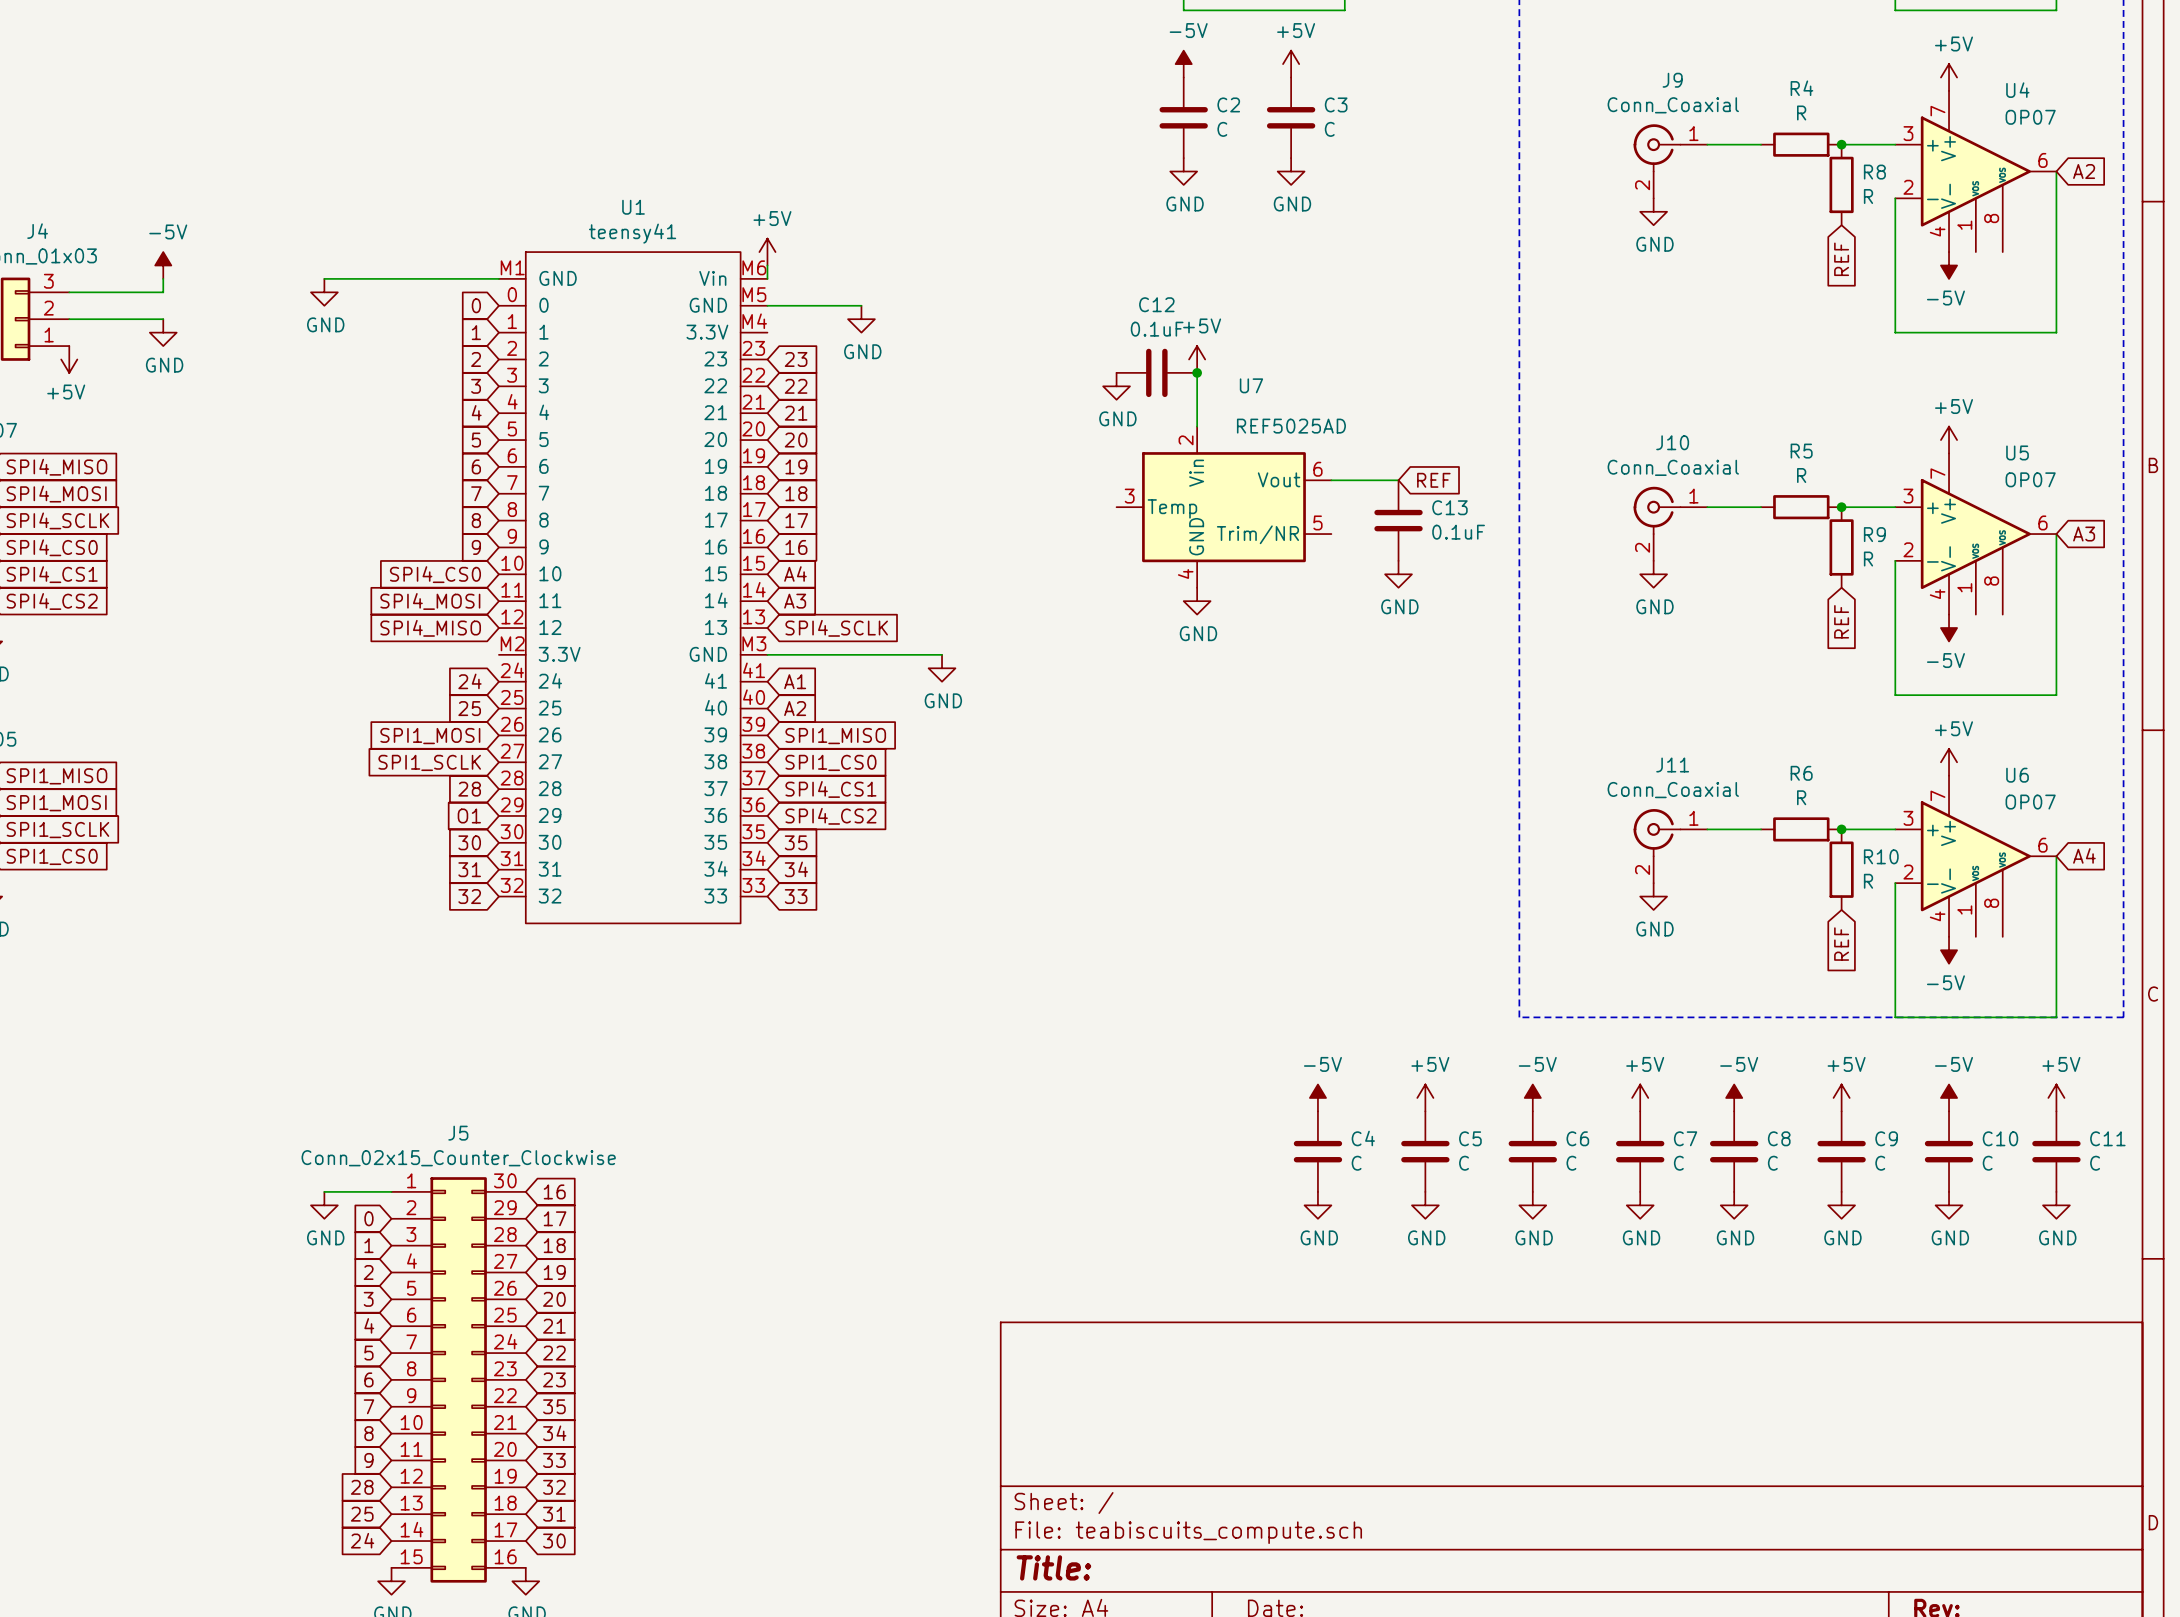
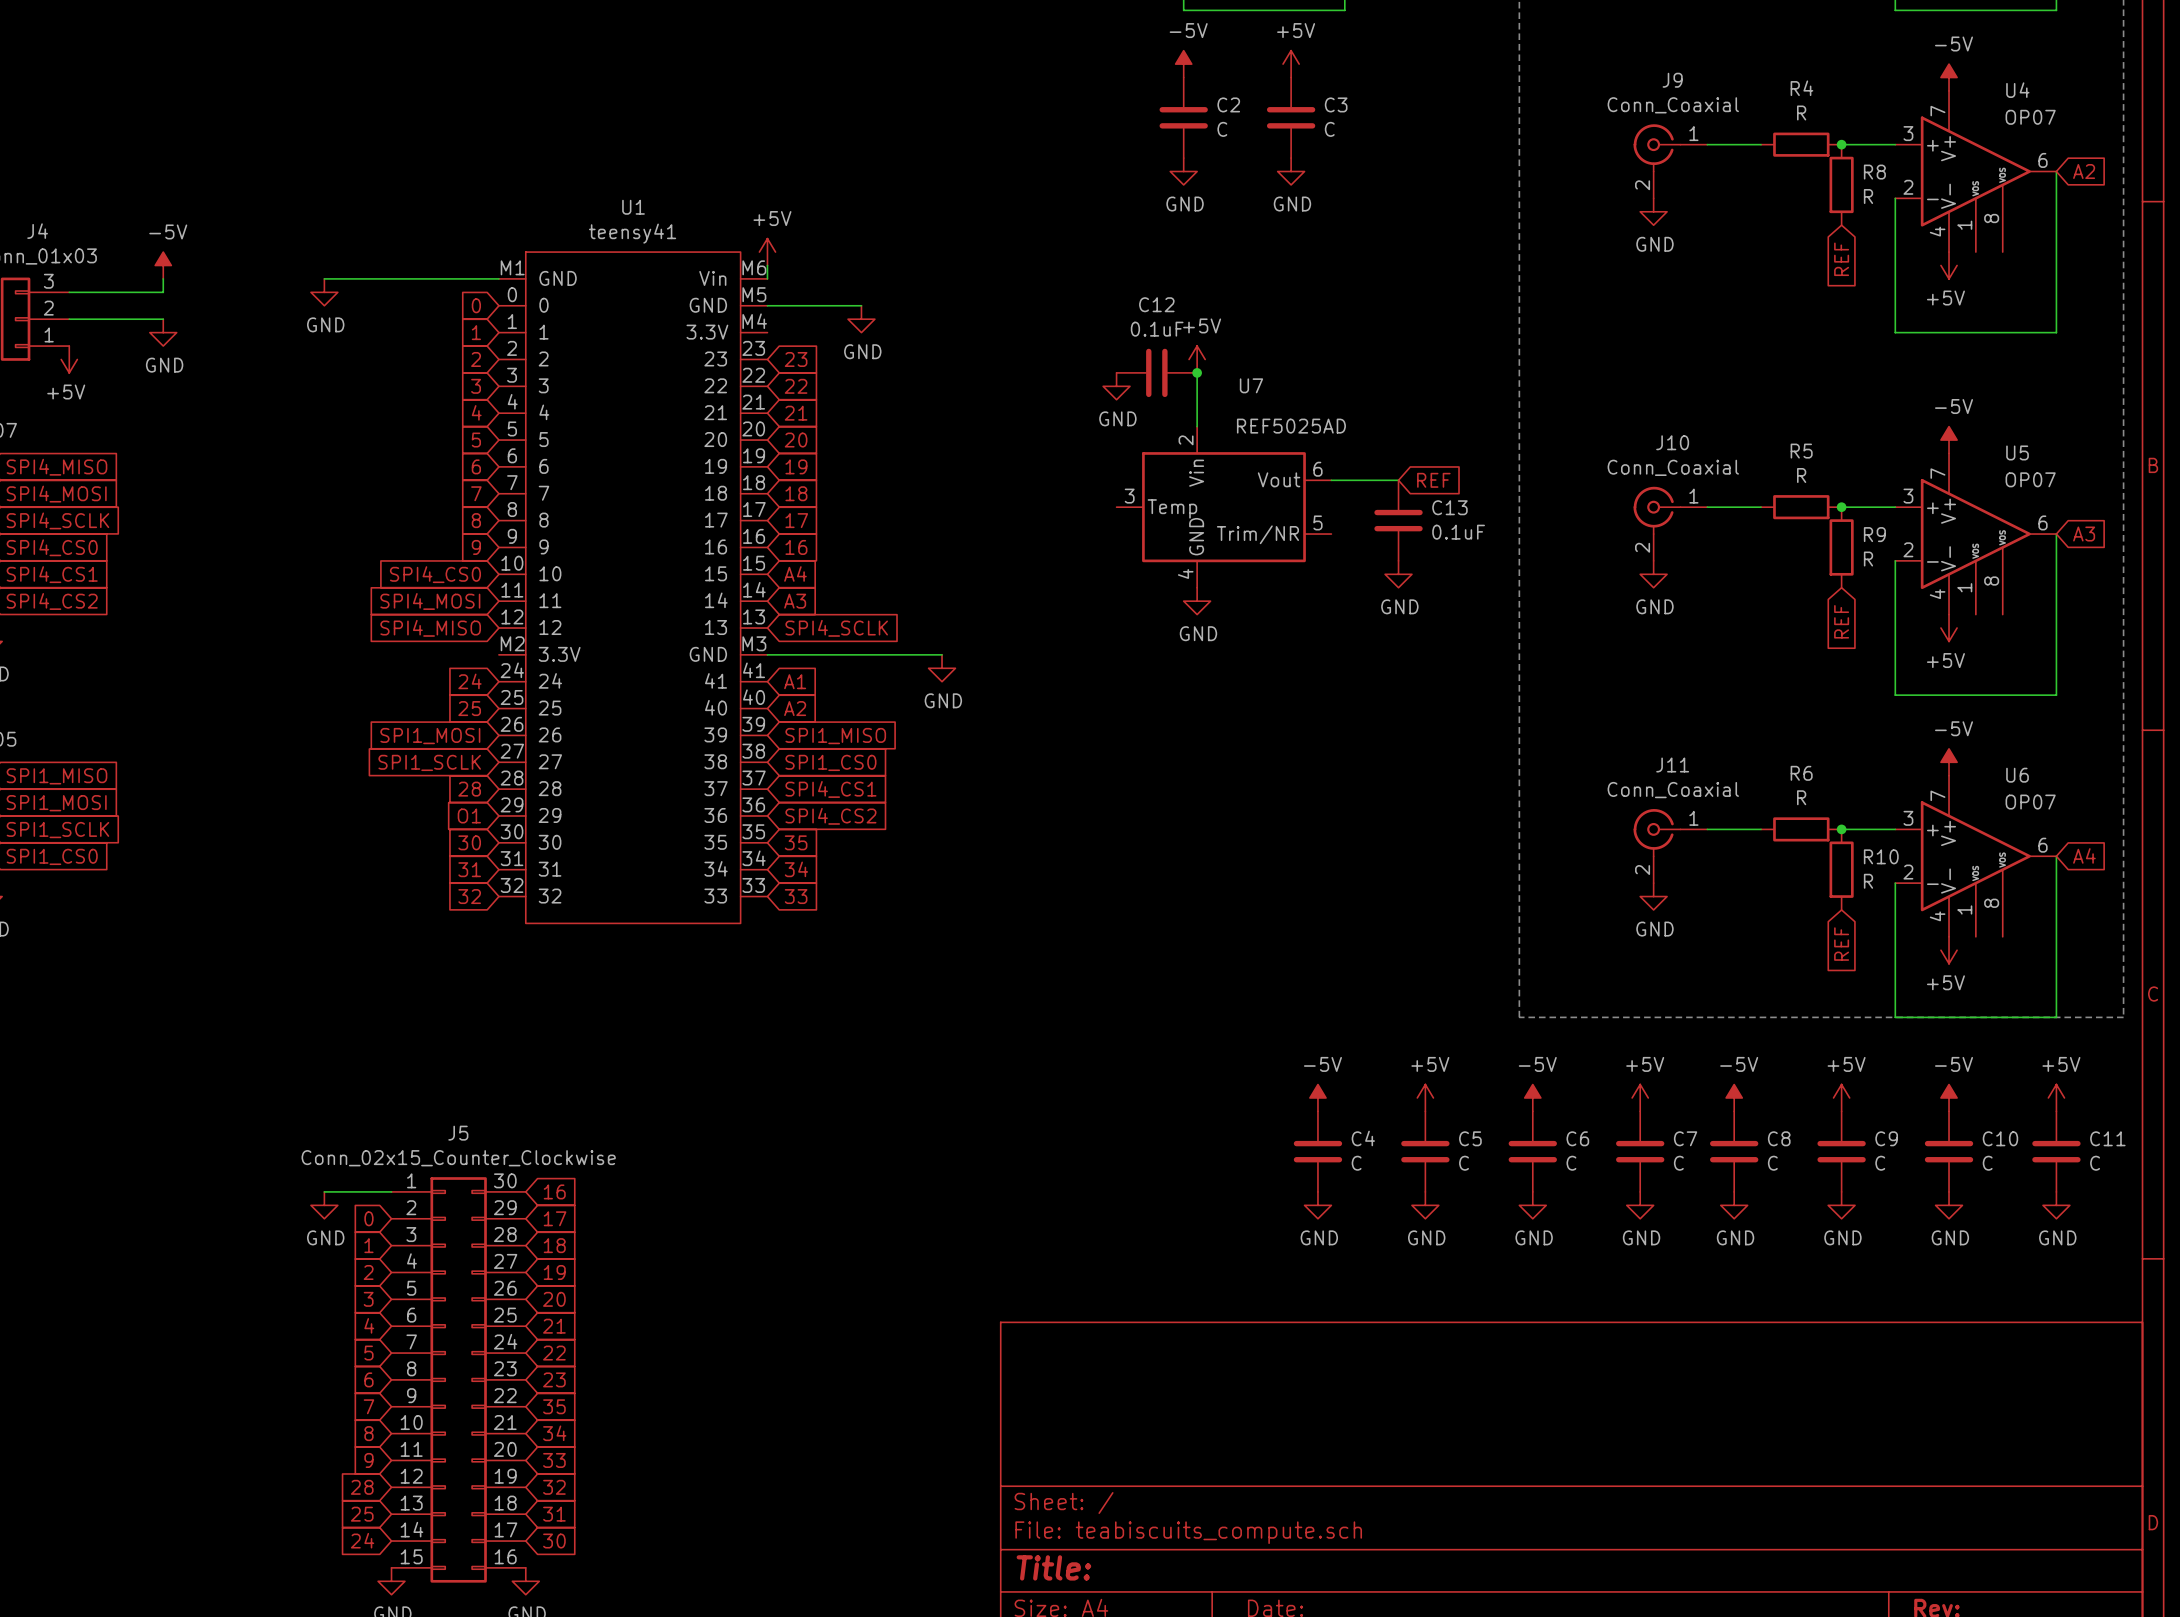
power symbol: +5V (1949, 77) -> -5V (1949, 77)
power symbol: -5V (1949, 265) -> +5V (1949, 265)
power symbol: +5V (1949, 440) -> -5V (1949, 440)
power symbol: -5V (1949, 628) -> +5V (1949, 628)
power symbol: +5V (1949, 762) -> -5V (1949, 762)
power symbol: -5V (1949, 950) -> +5V (1949, 950)

